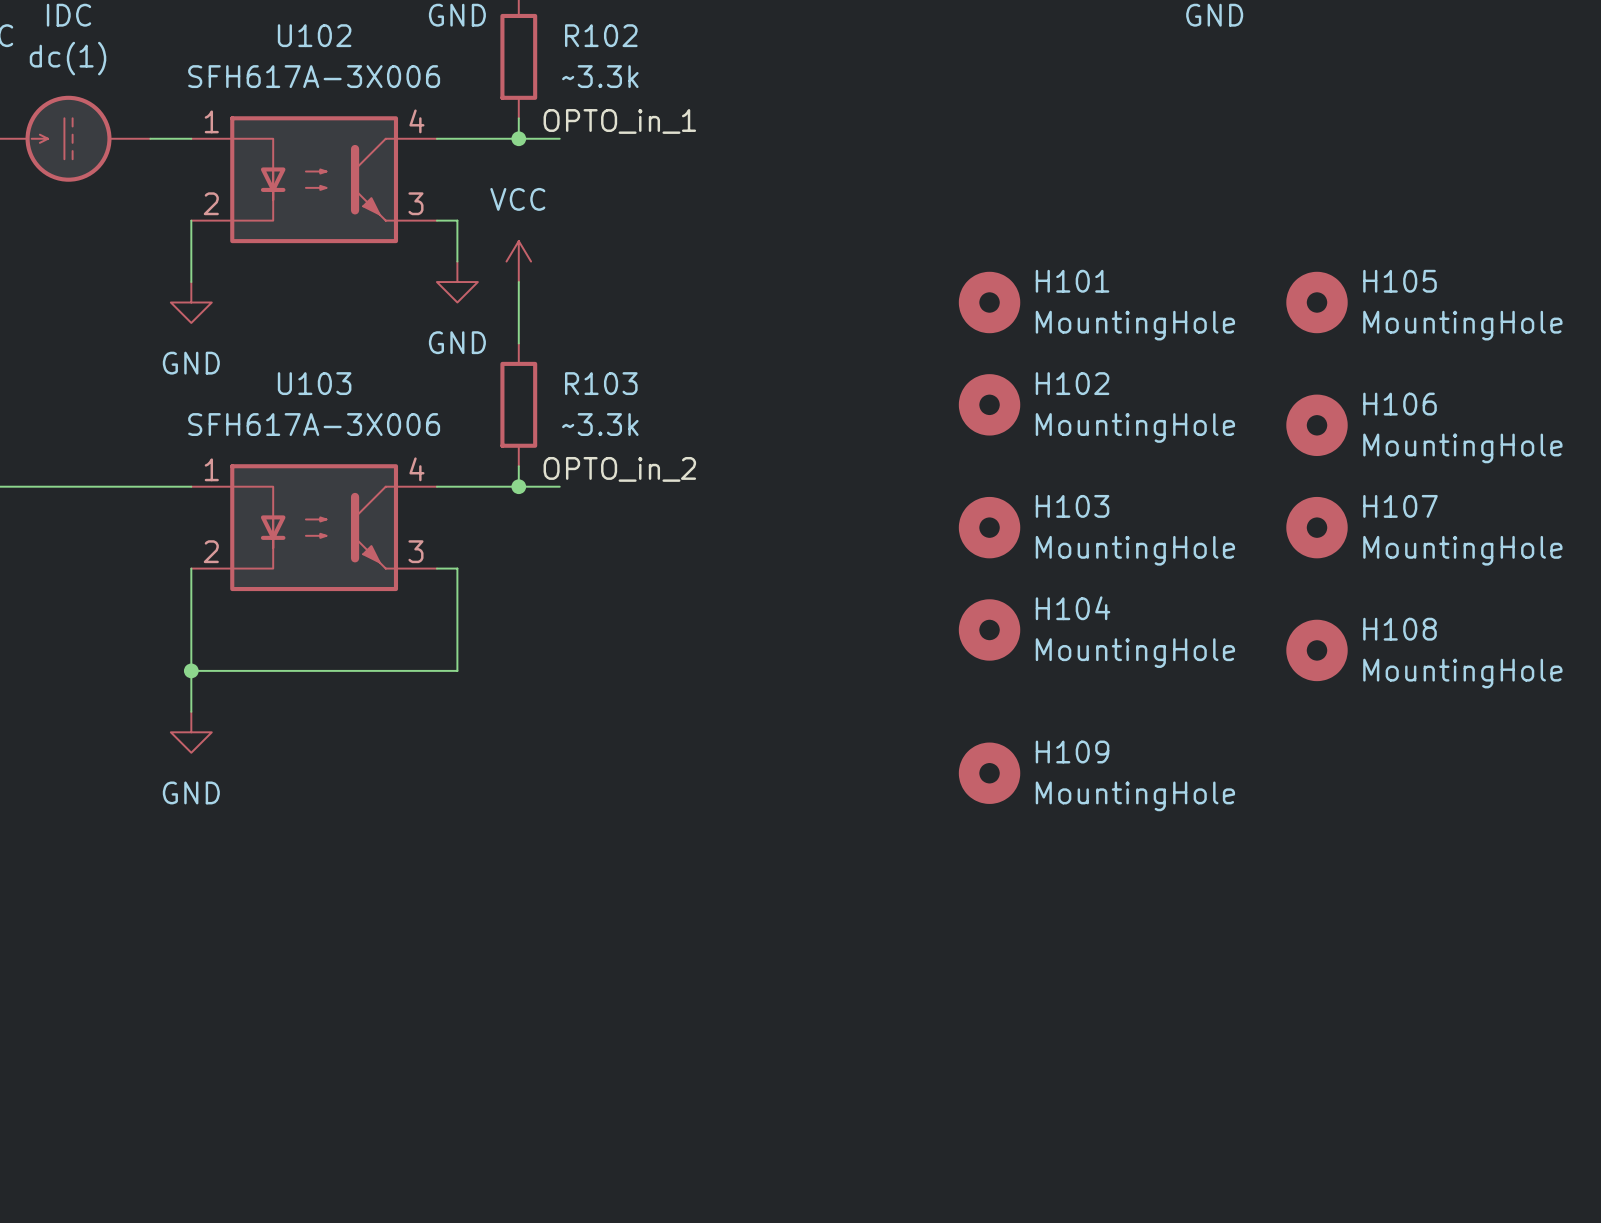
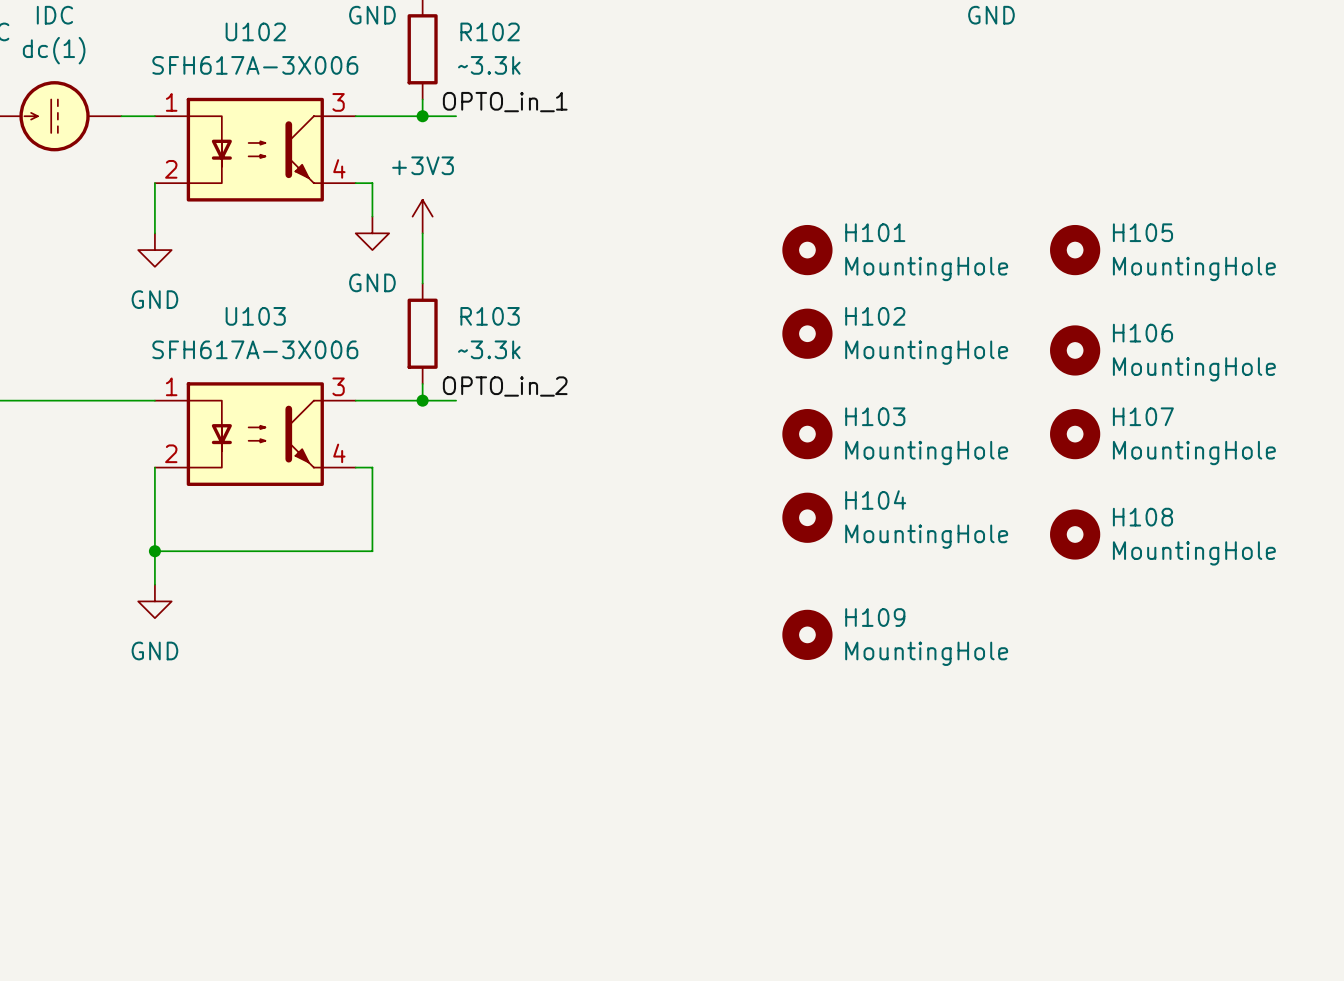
U102 pin number: 4 (416, 121) -> 3 (338, 102)
U102 pin number: 3 (415, 203) -> 4 (339, 168)
power symbol: VCC (518, 261) -> +3V3 (422, 216)
U103 pin number: 4 (416, 469) -> 3 (338, 386)
U103 pin number: 3 (415, 551) -> 4 (339, 453)

